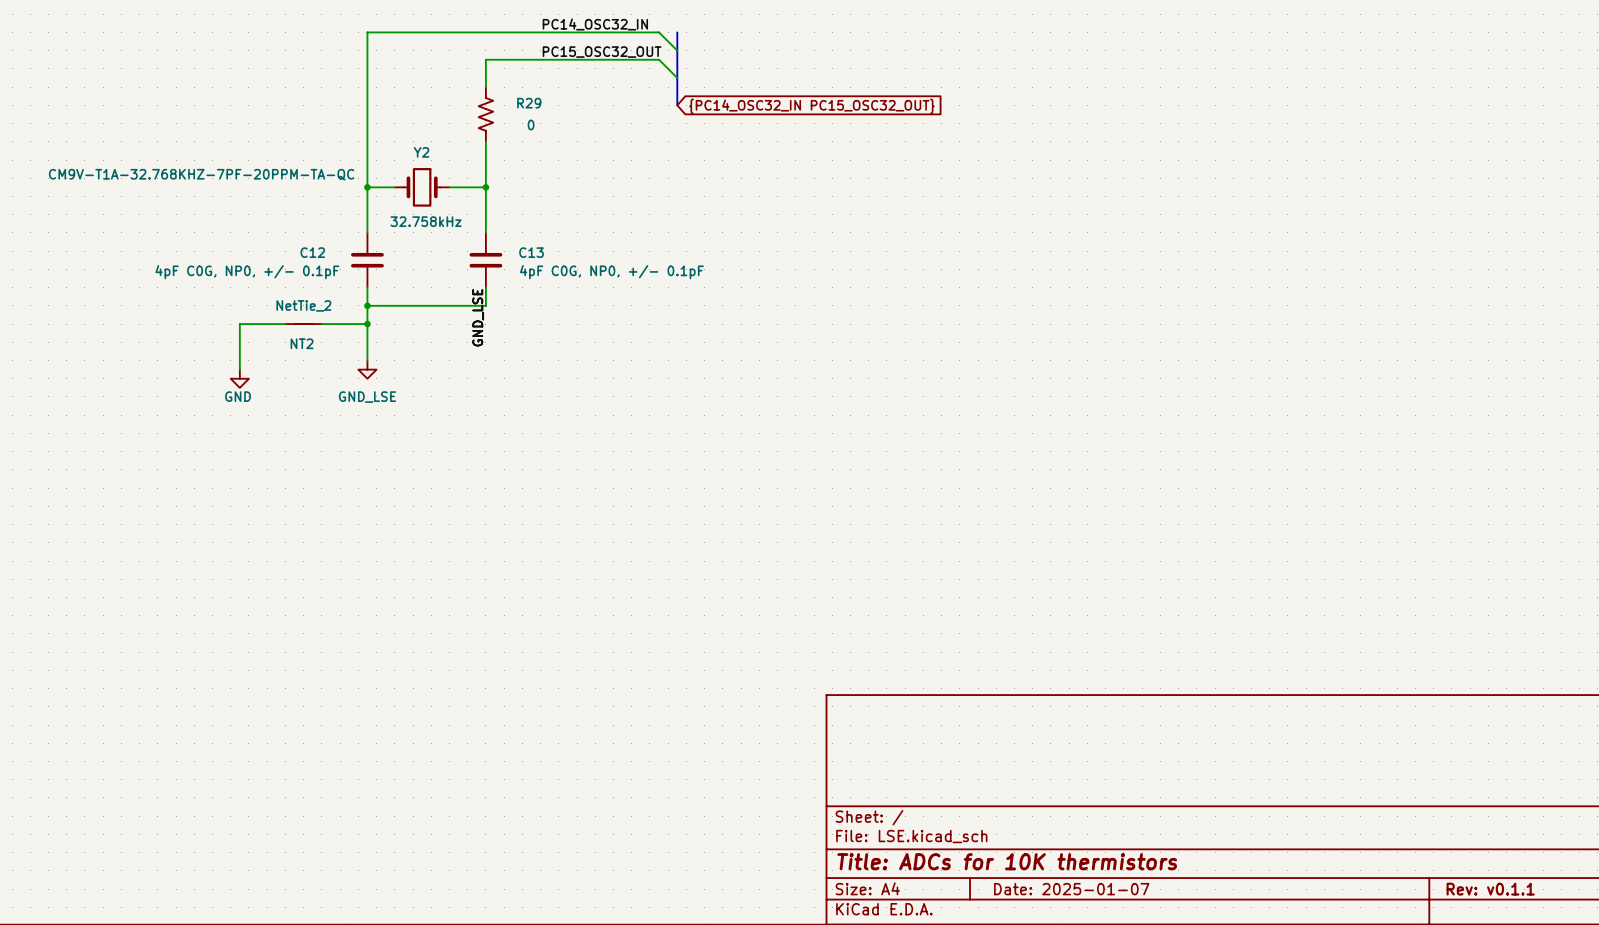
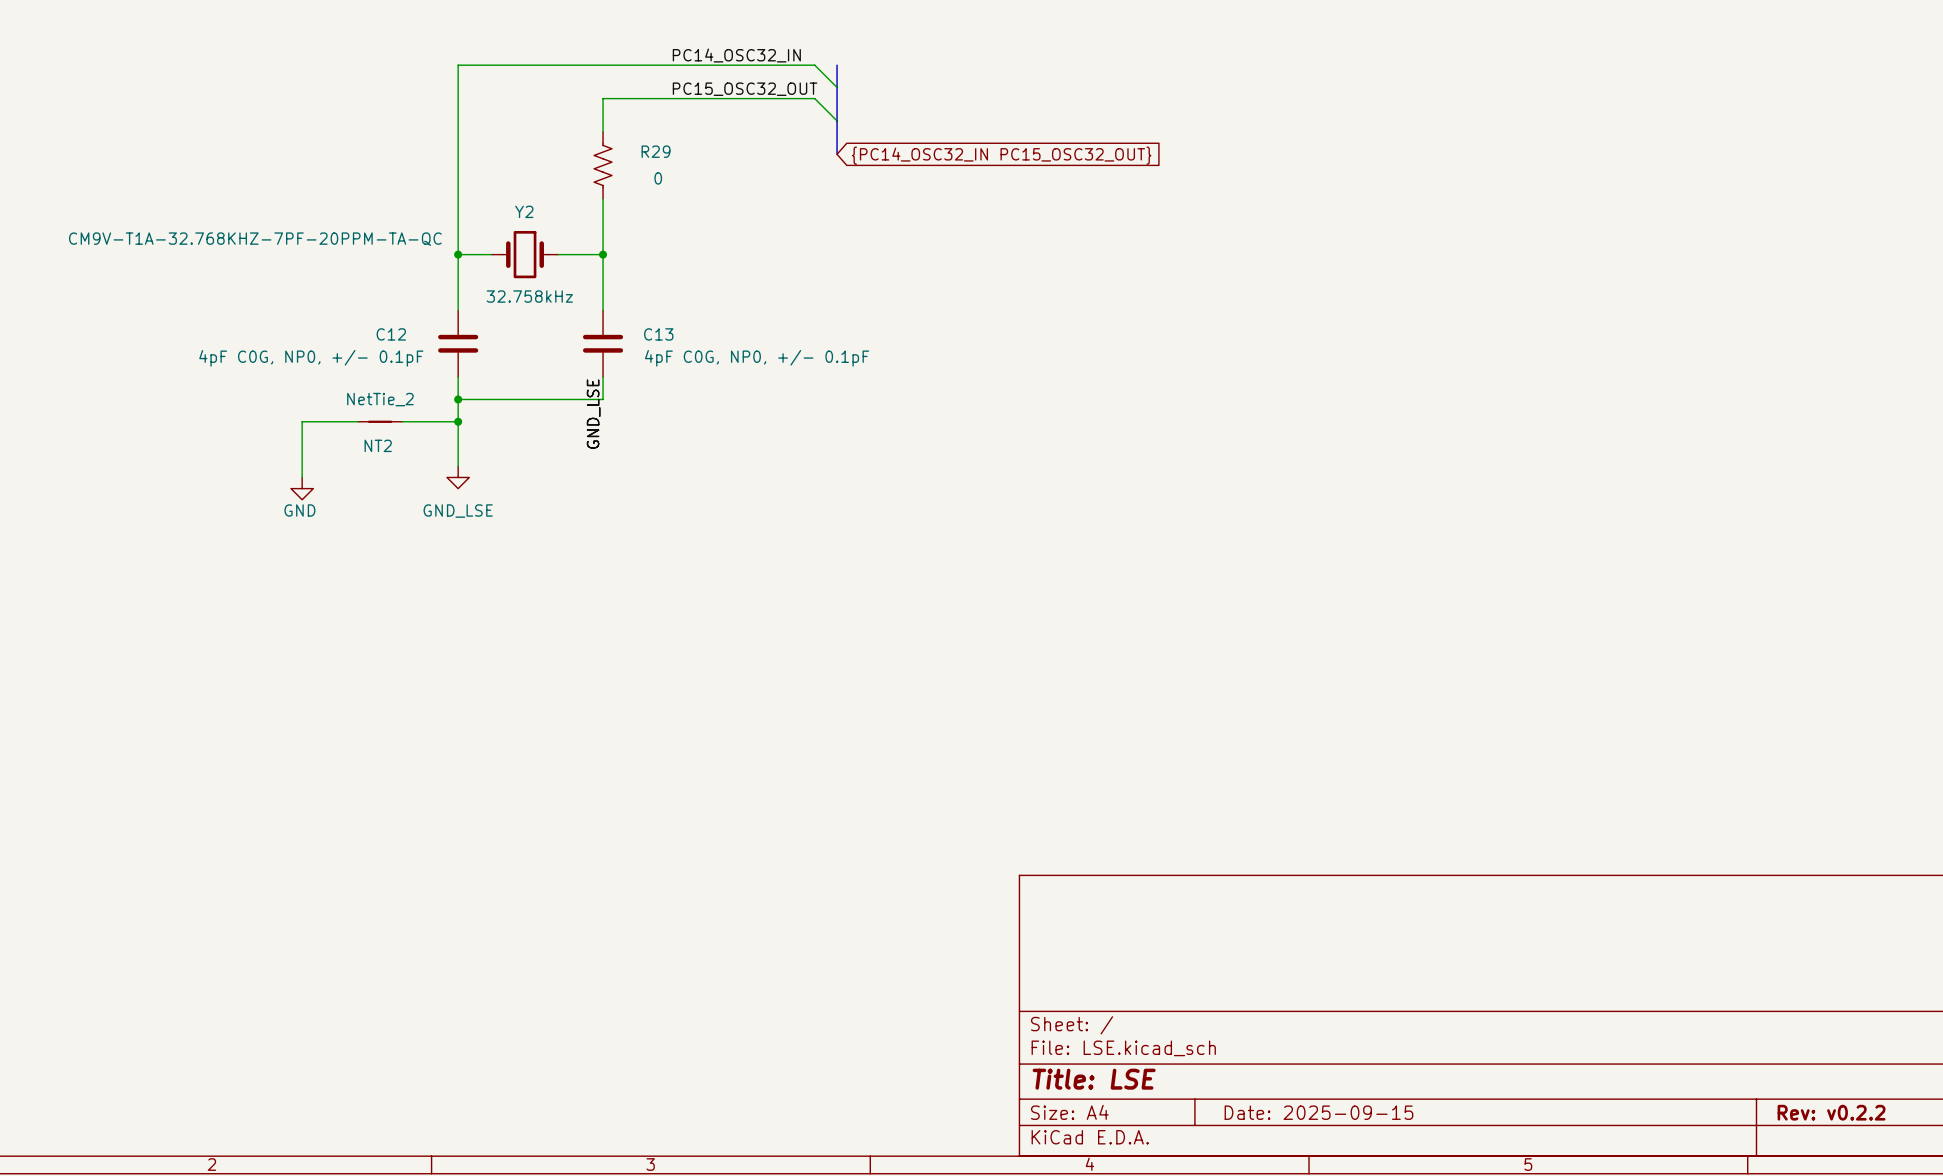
title block: Title: ADCs for 10K thermistors (1007, 861) -> Title: LSE (1094, 1079)
title block: Date: 2025-01-07 (1071, 889) -> Date: 2025-09-15 (1318, 1112)
title block: Rev: v0.1.1 (1490, 889) -> Rev: v0.2.2 (1831, 1112)

